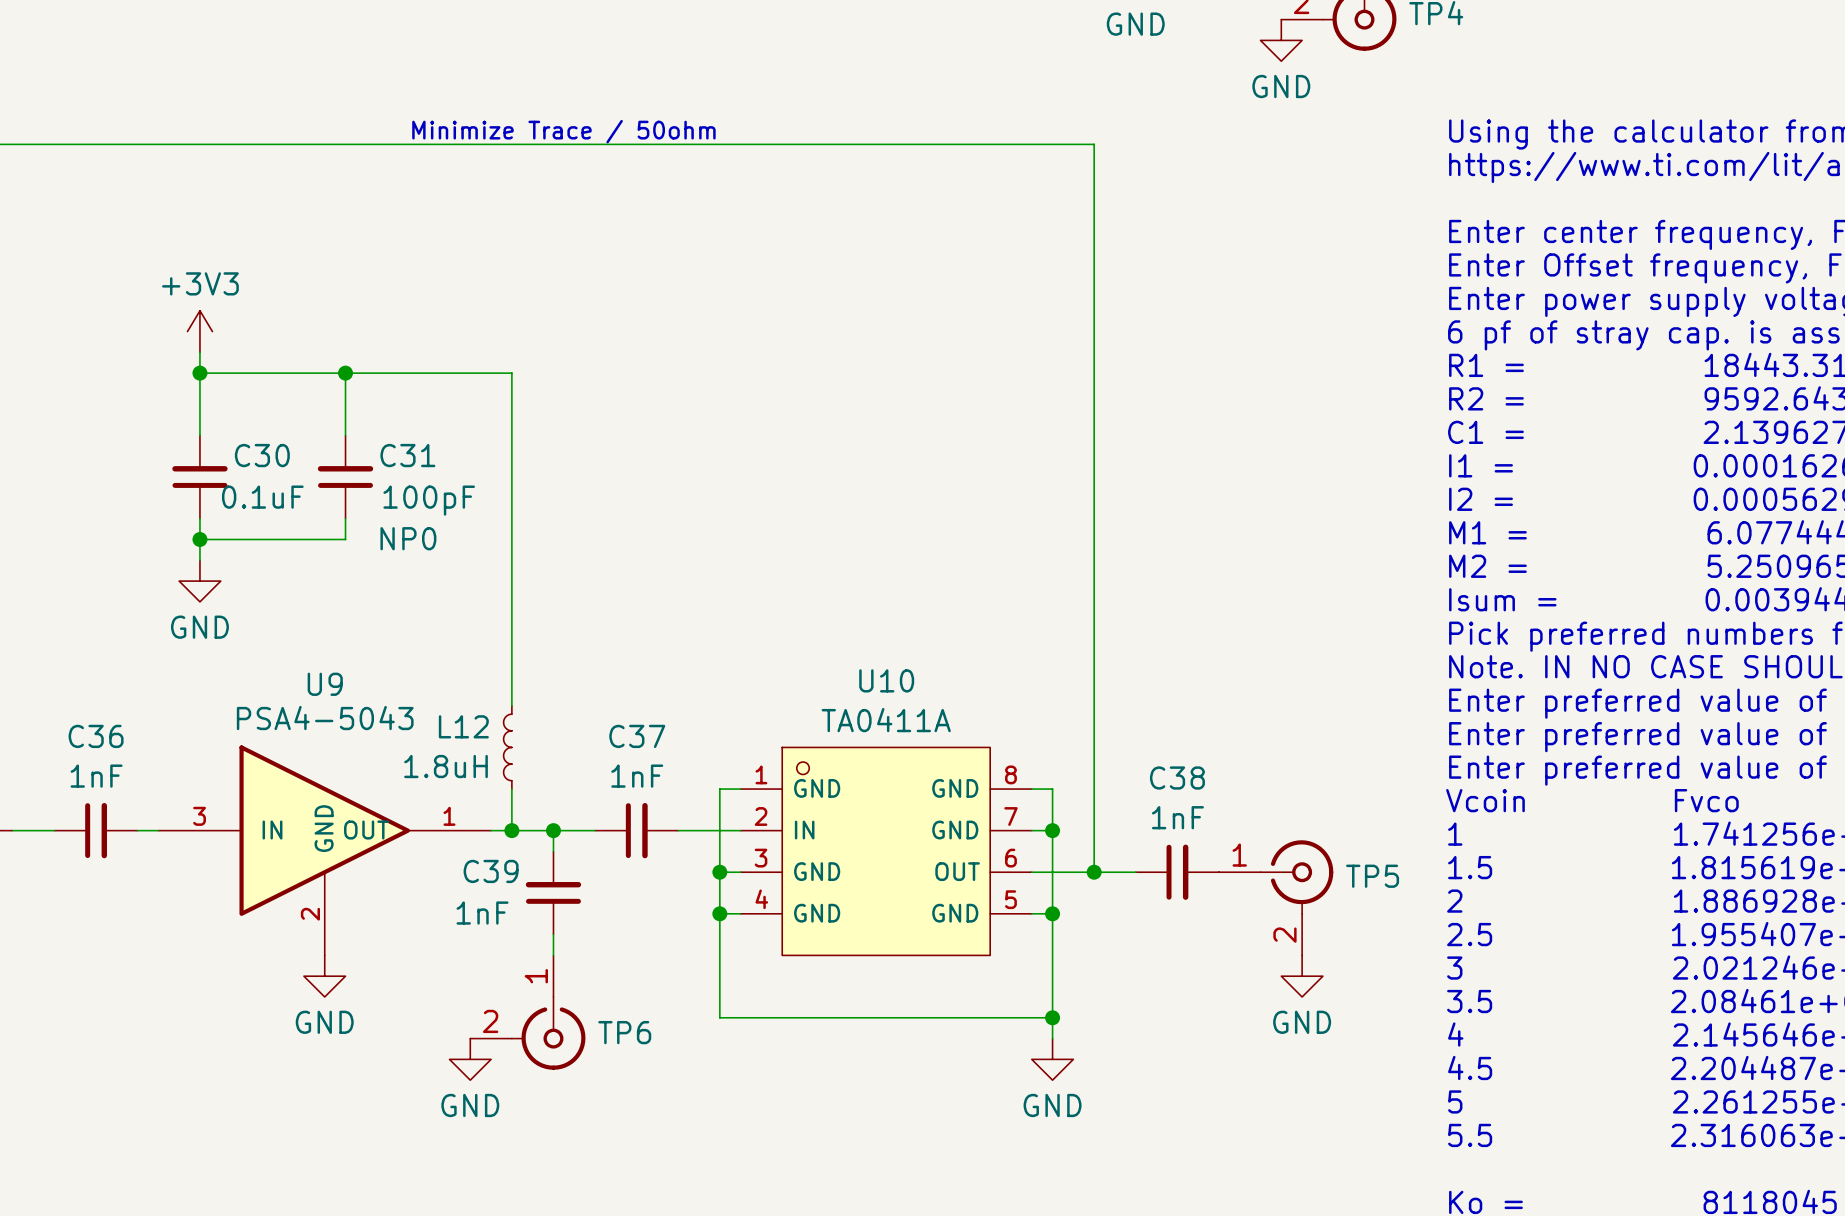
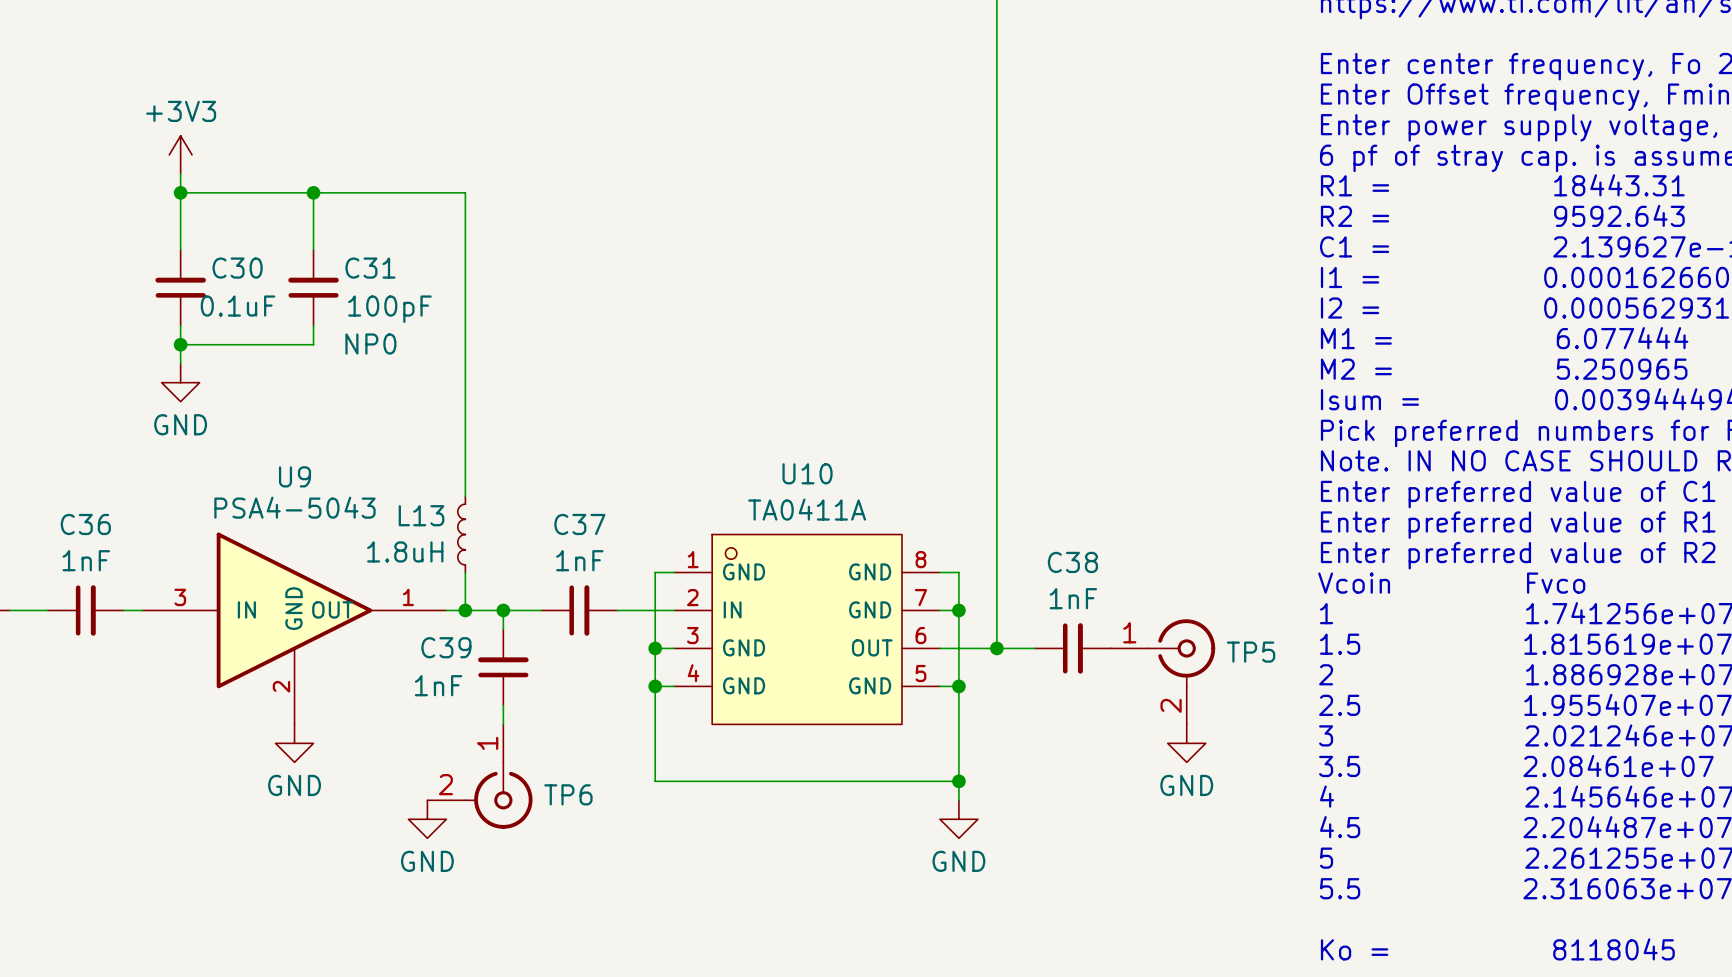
L12 name: L12 (463, 726) -> L13 (421, 515)

